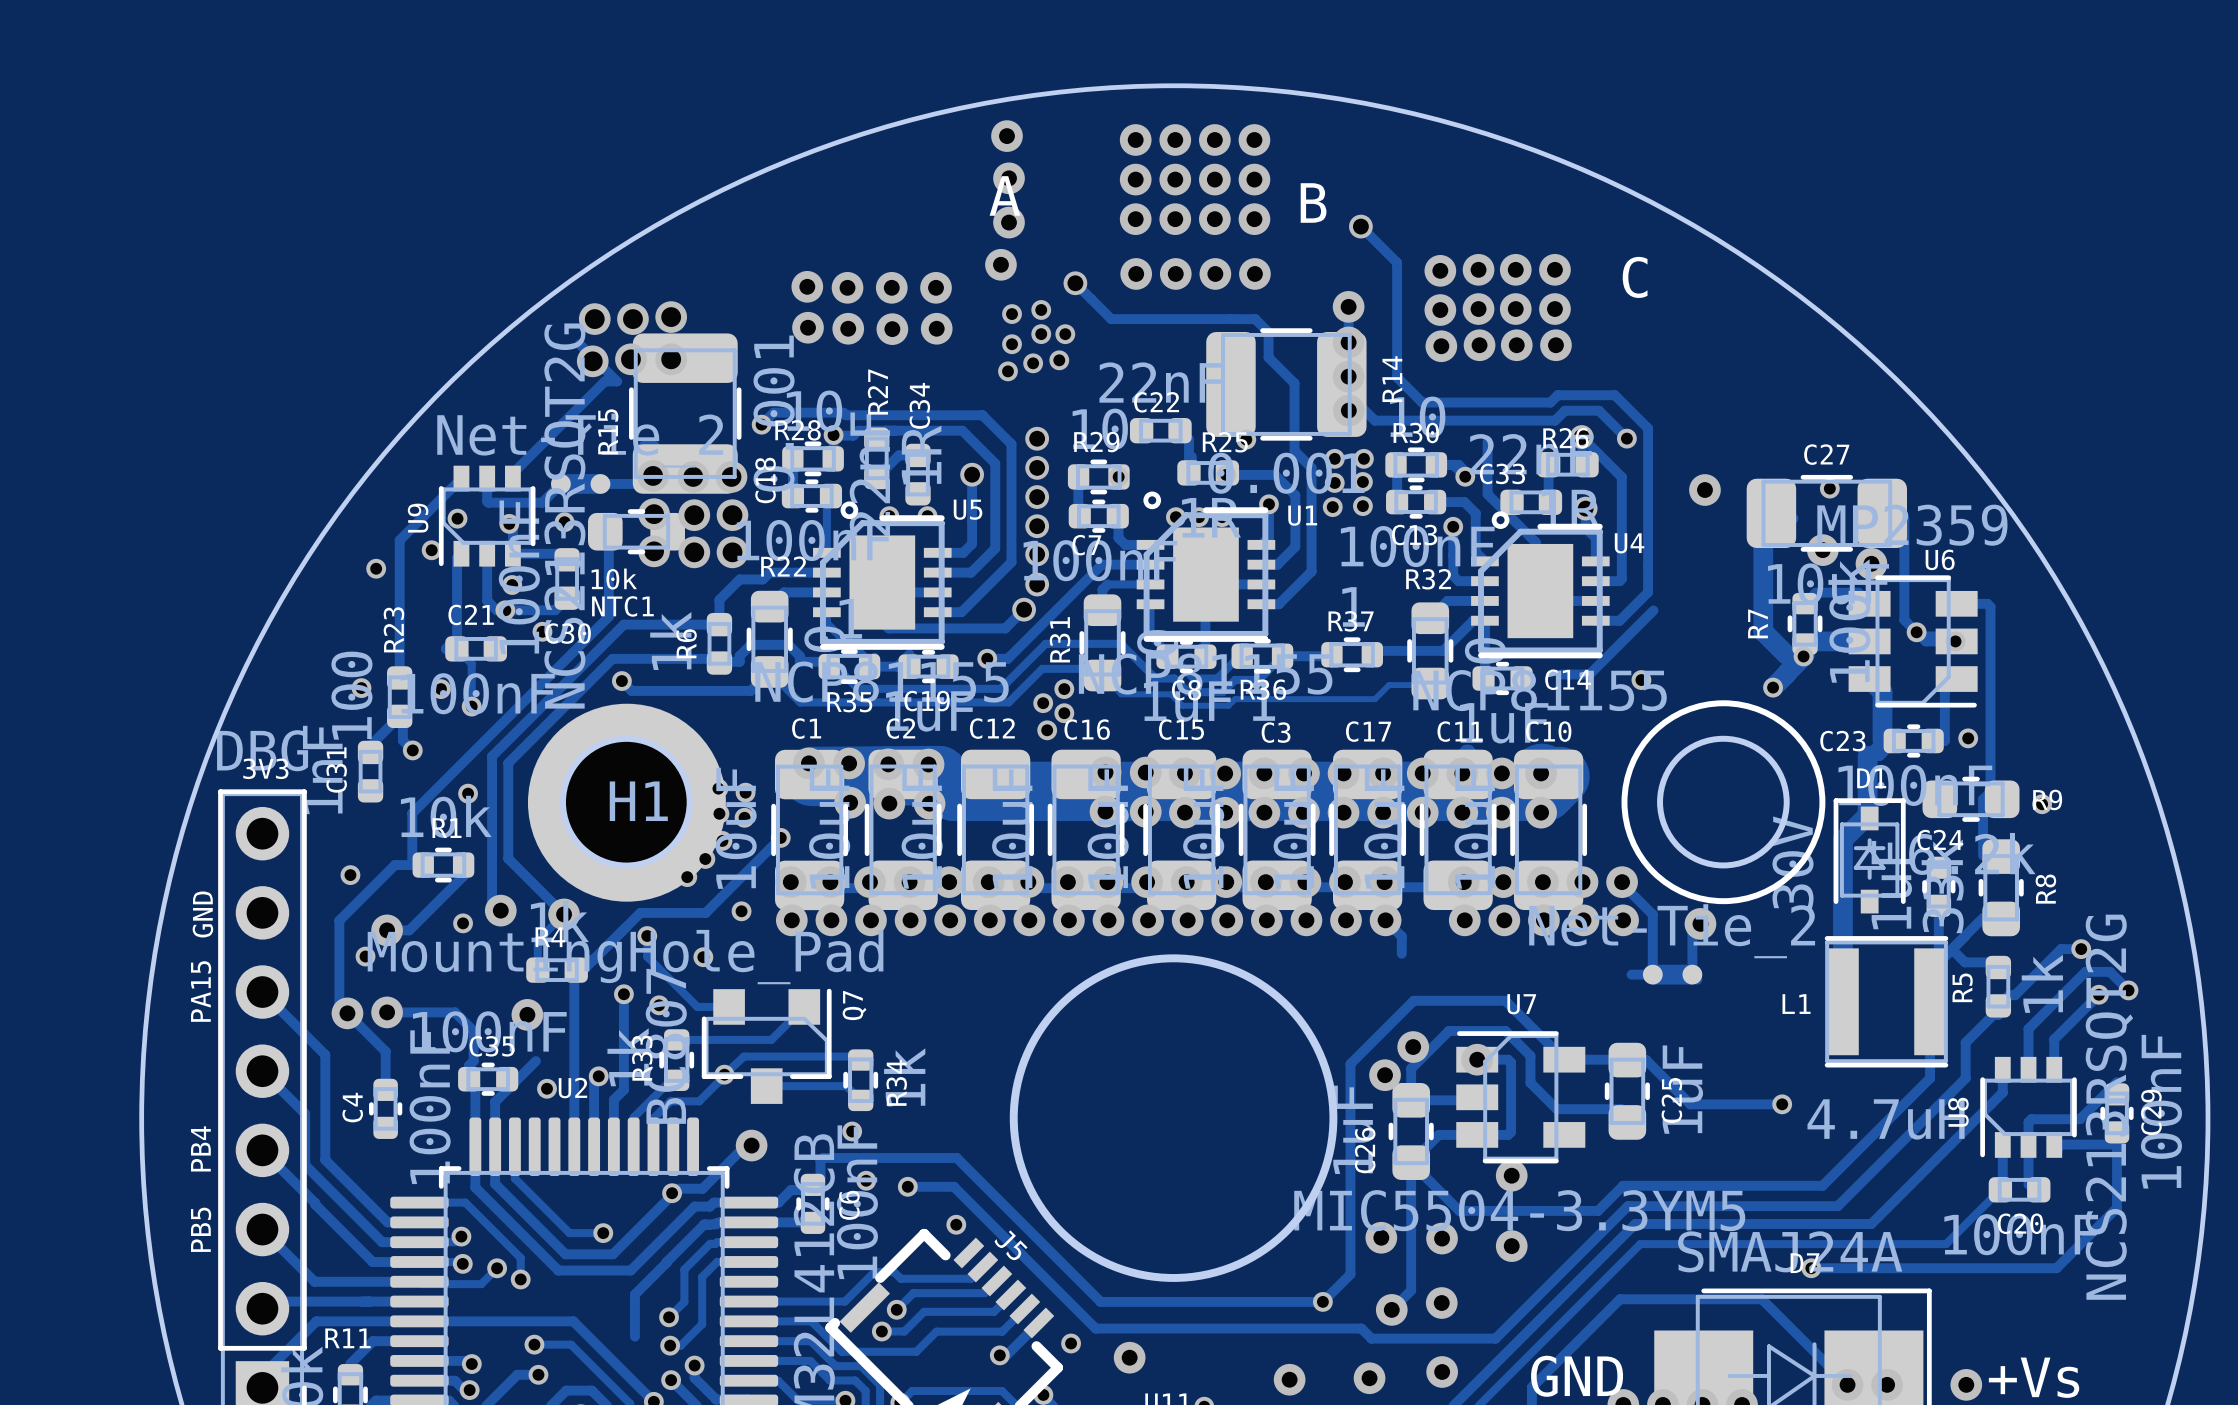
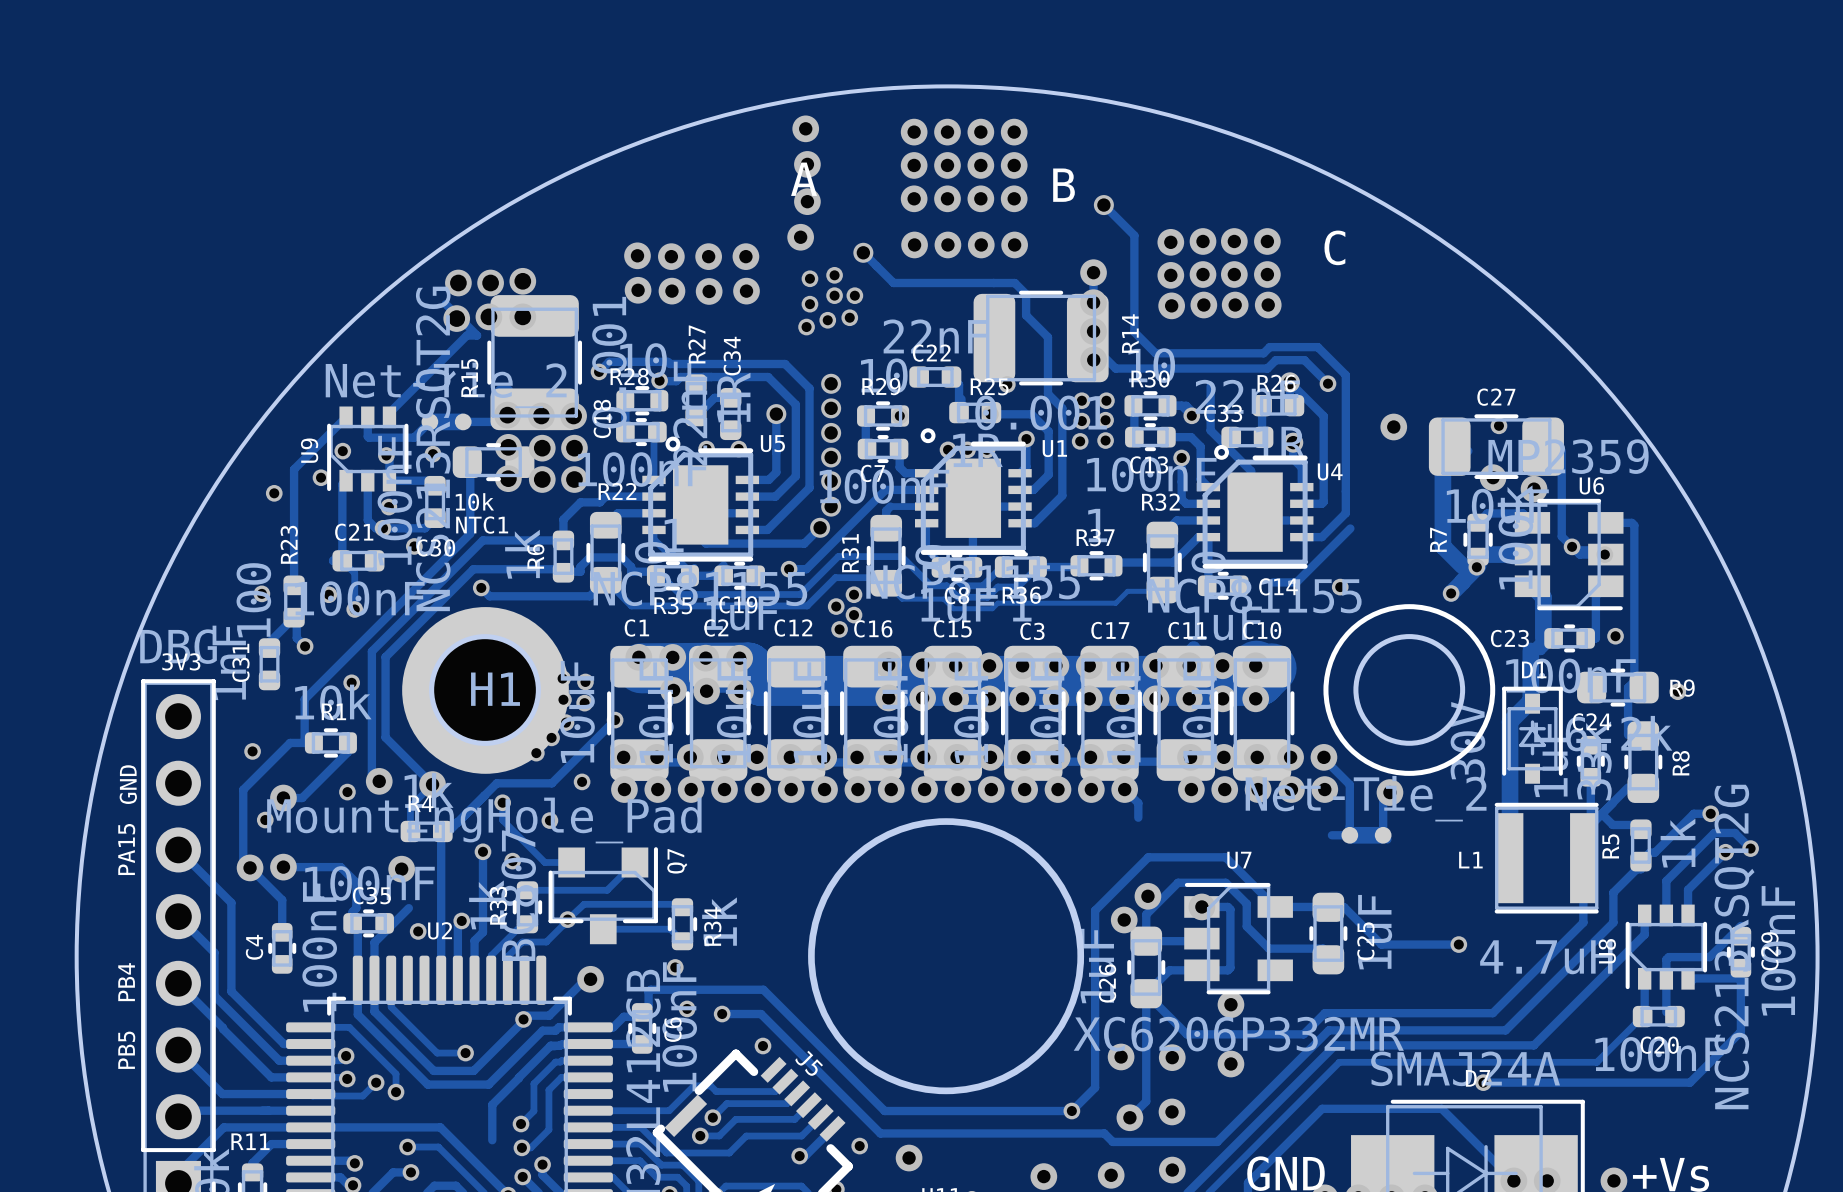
U7 value: MIC5504-3.3YM5 (1519, 1210) -> XC6206P332MR (1238, 1034)

